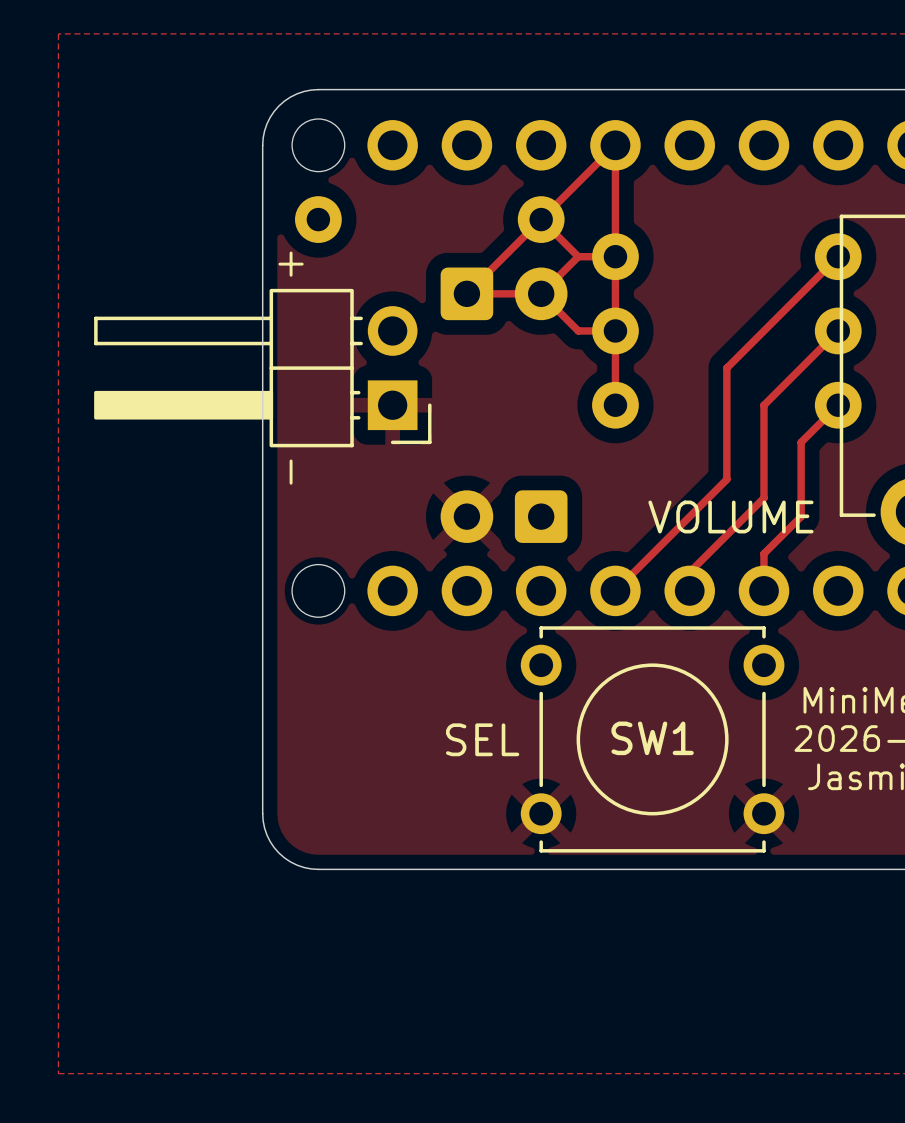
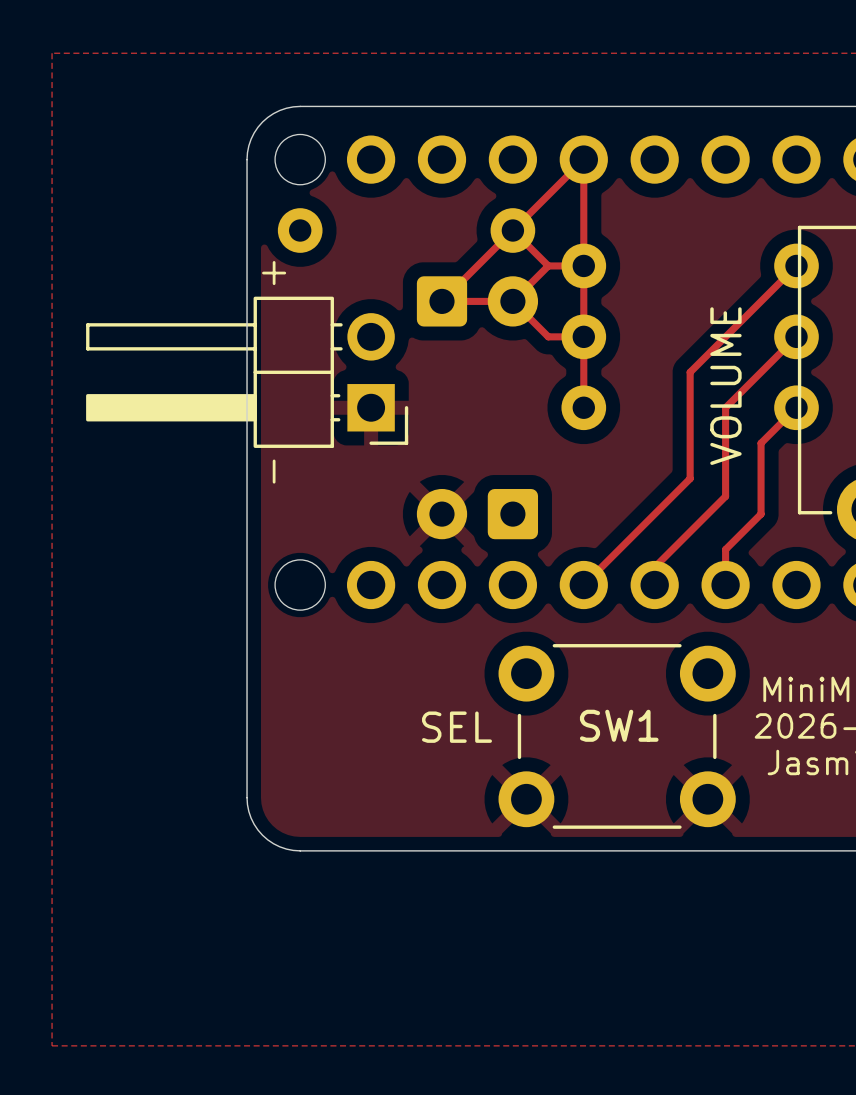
text rotation: 0° (730, 517) -> 90° counterclockwise (725, 386)
SW1 footprint: [520, 626, 785, 853] -> [498, 644, 736, 829]

